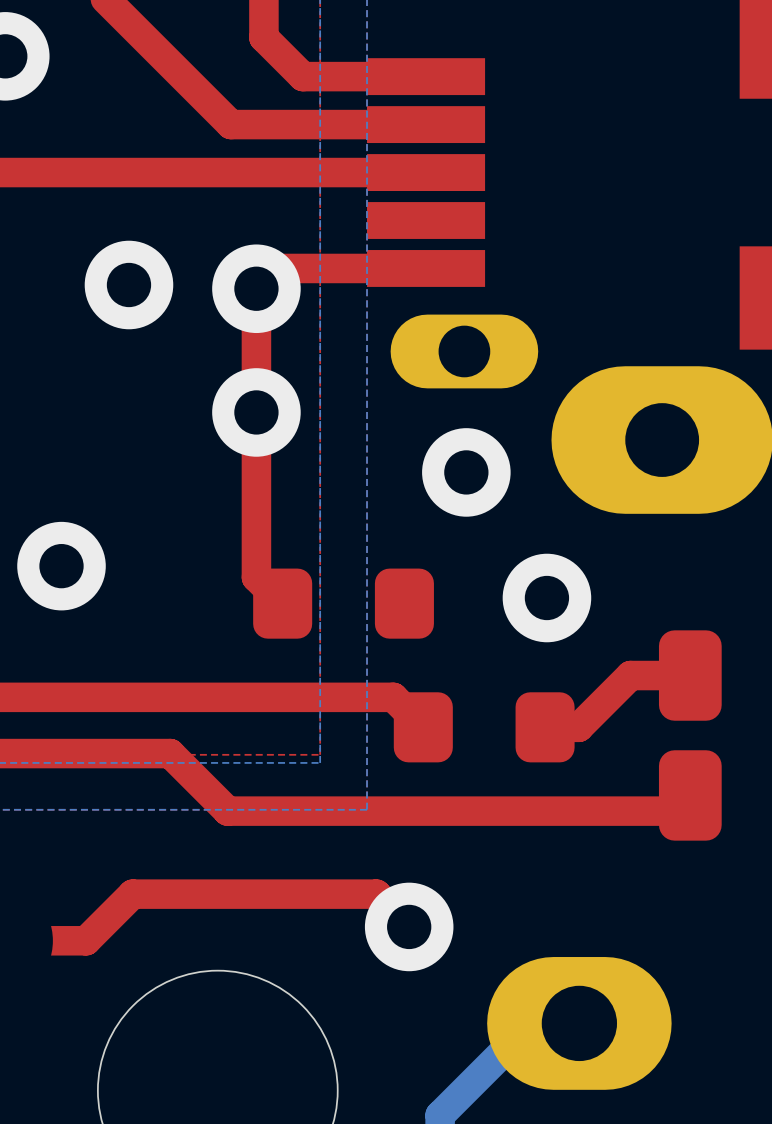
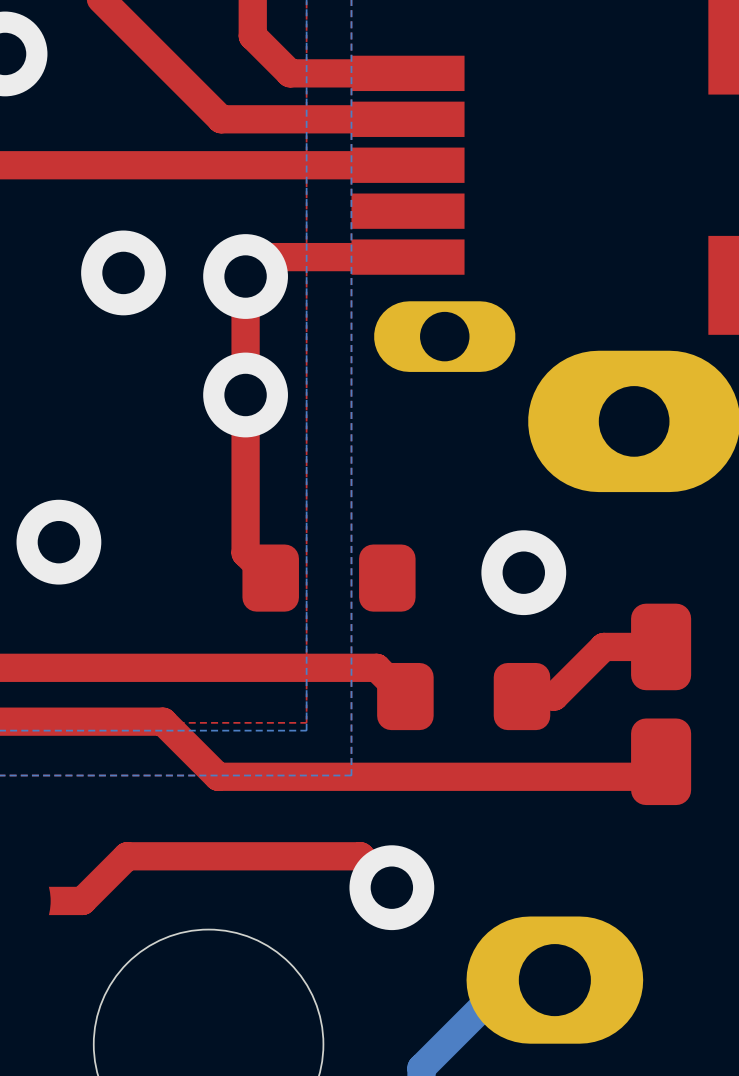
via: (466, 472) -> none

